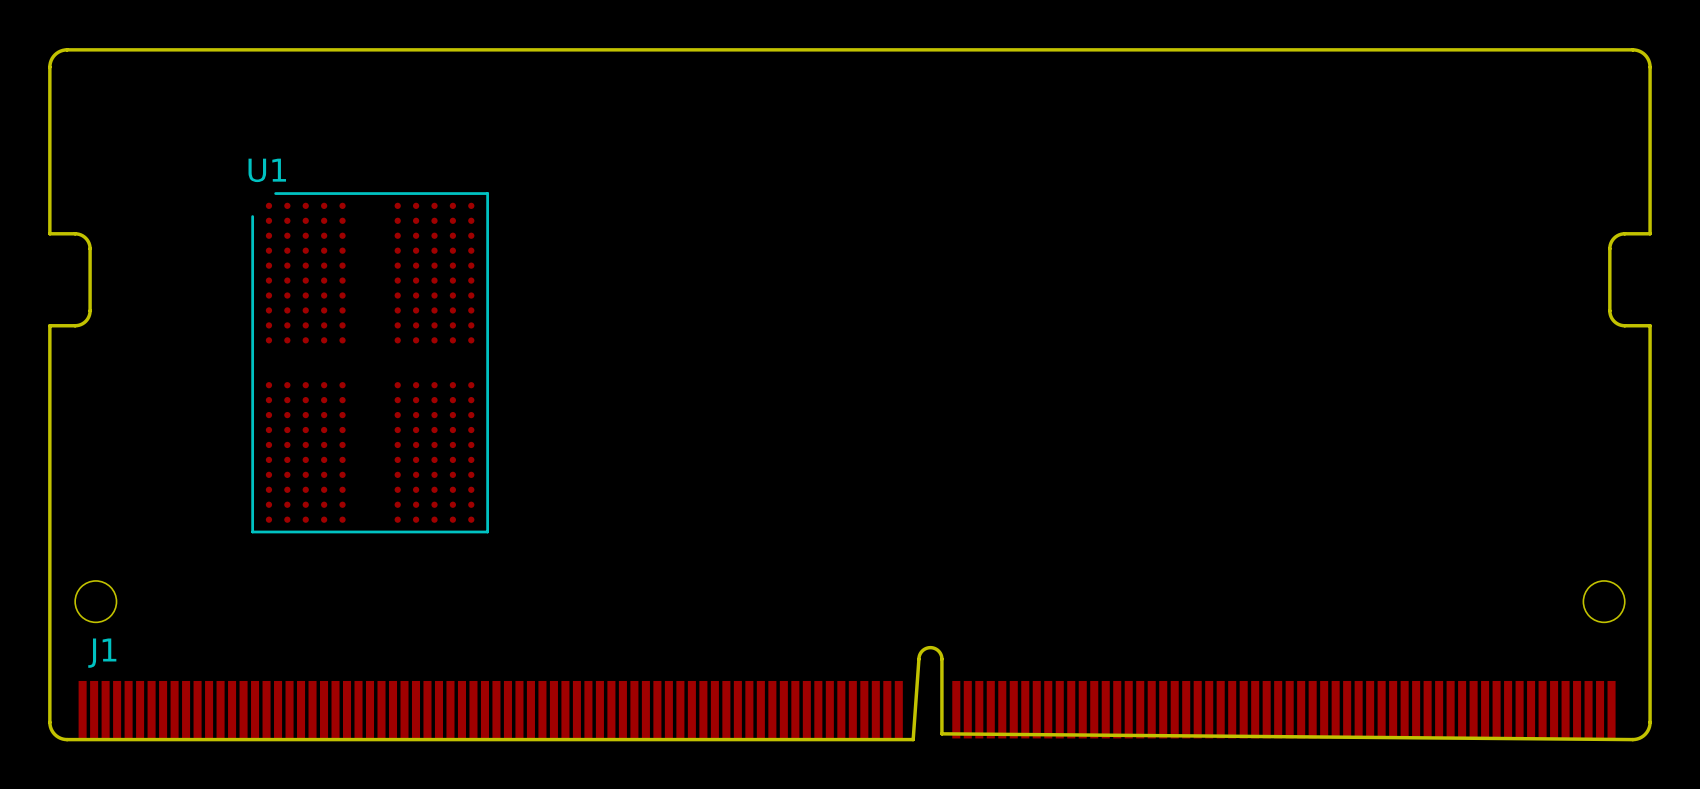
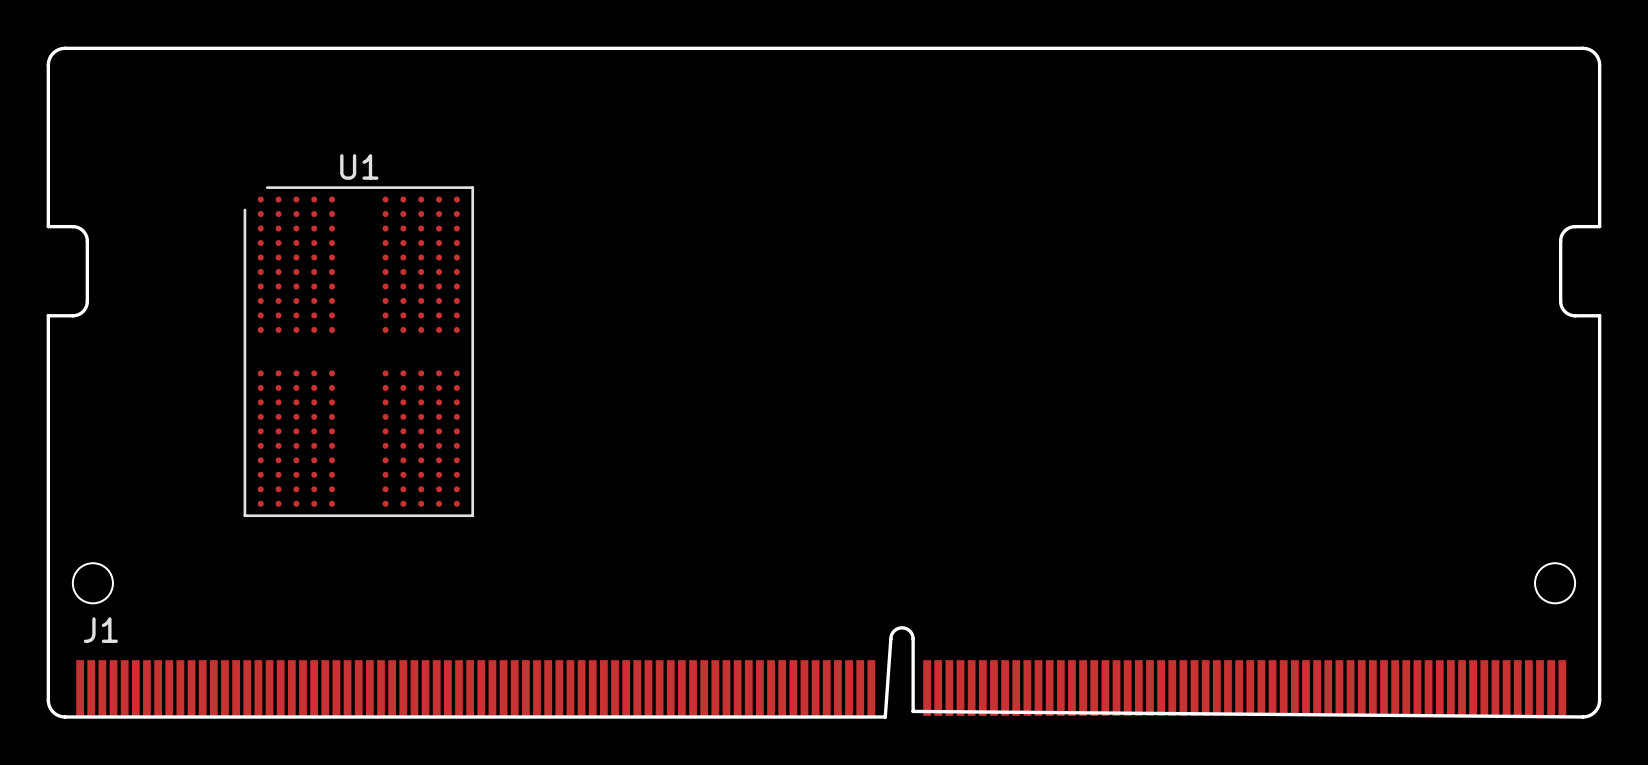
U1 name position: U1 (267, 170) -> U1 (359, 166)

